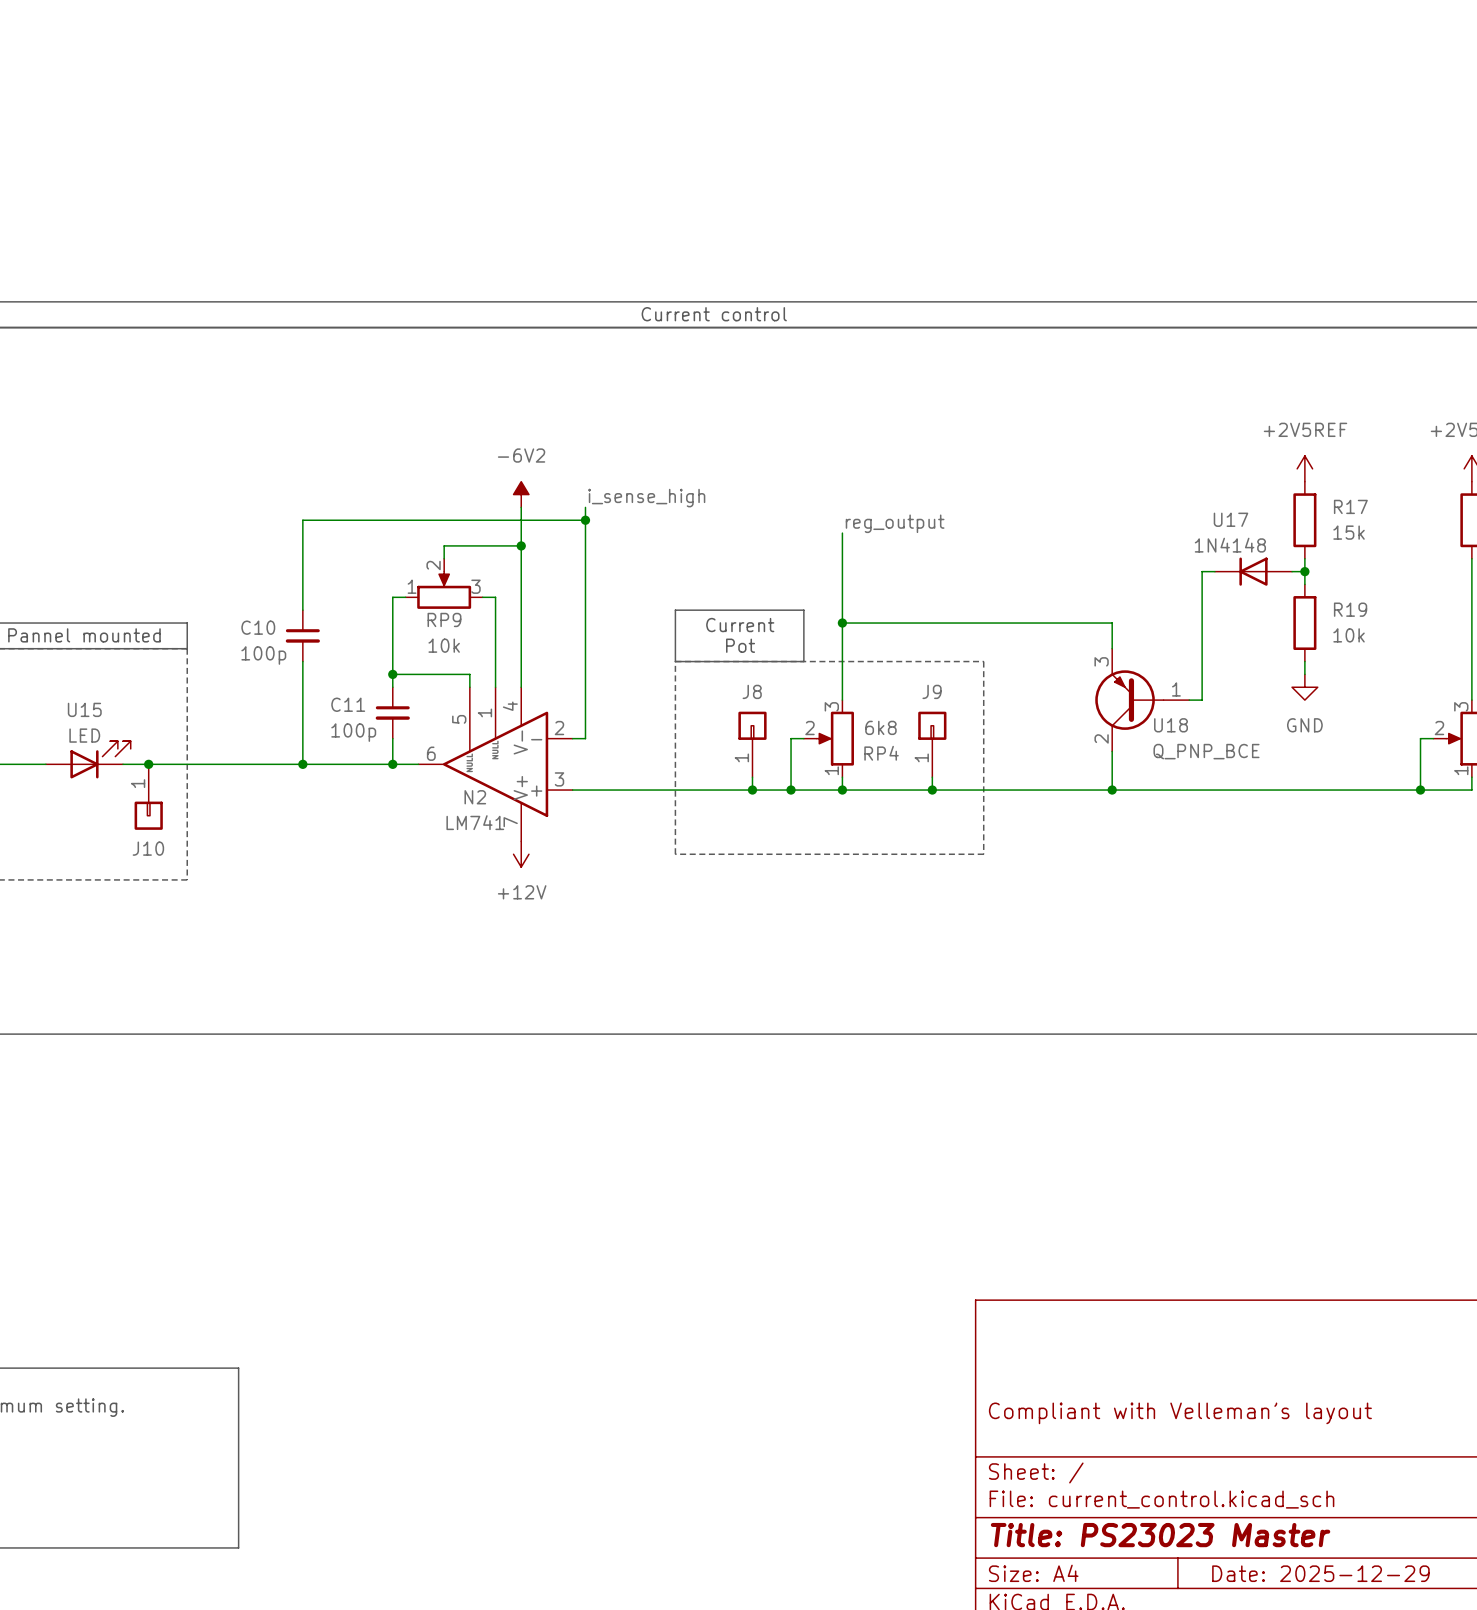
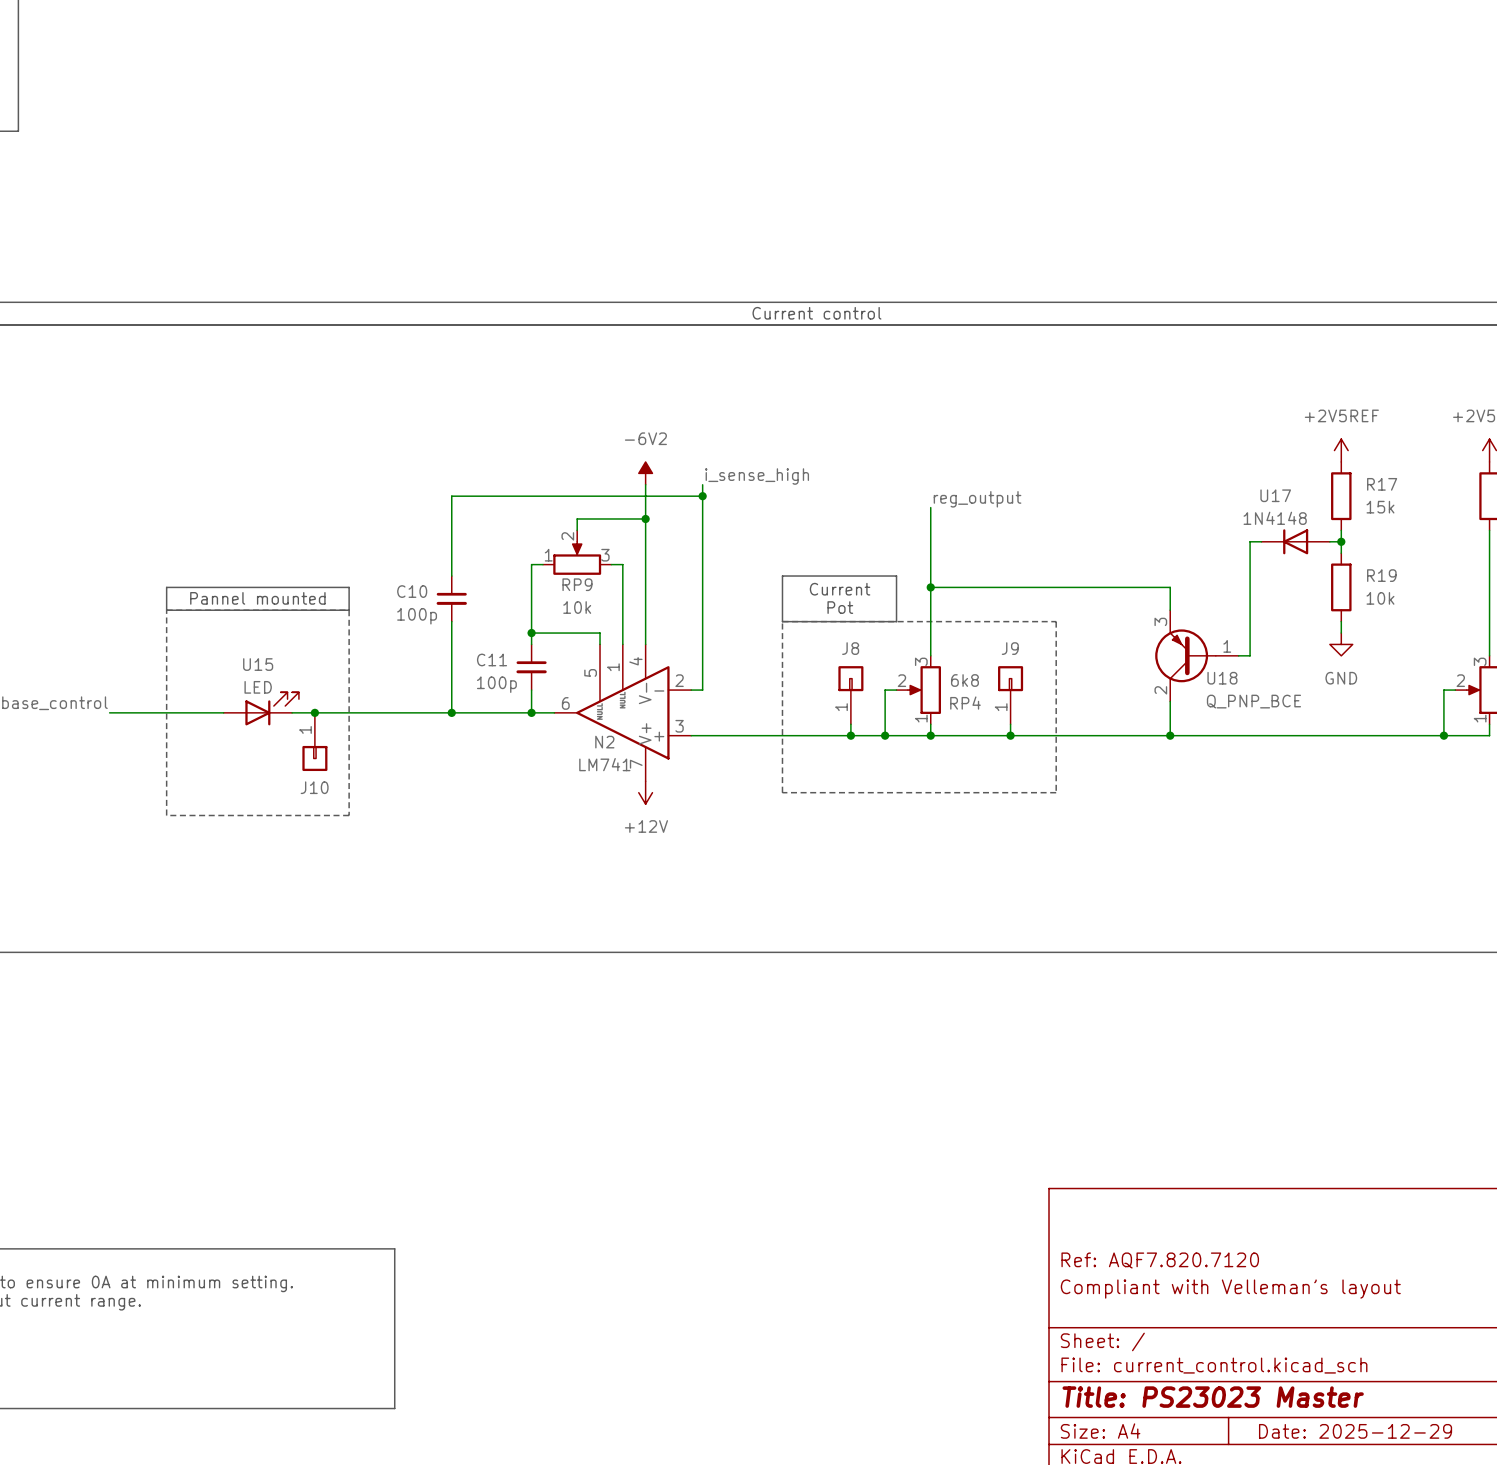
title block: none -> Ref: AQF7.820.7120 (1160, 1260)

